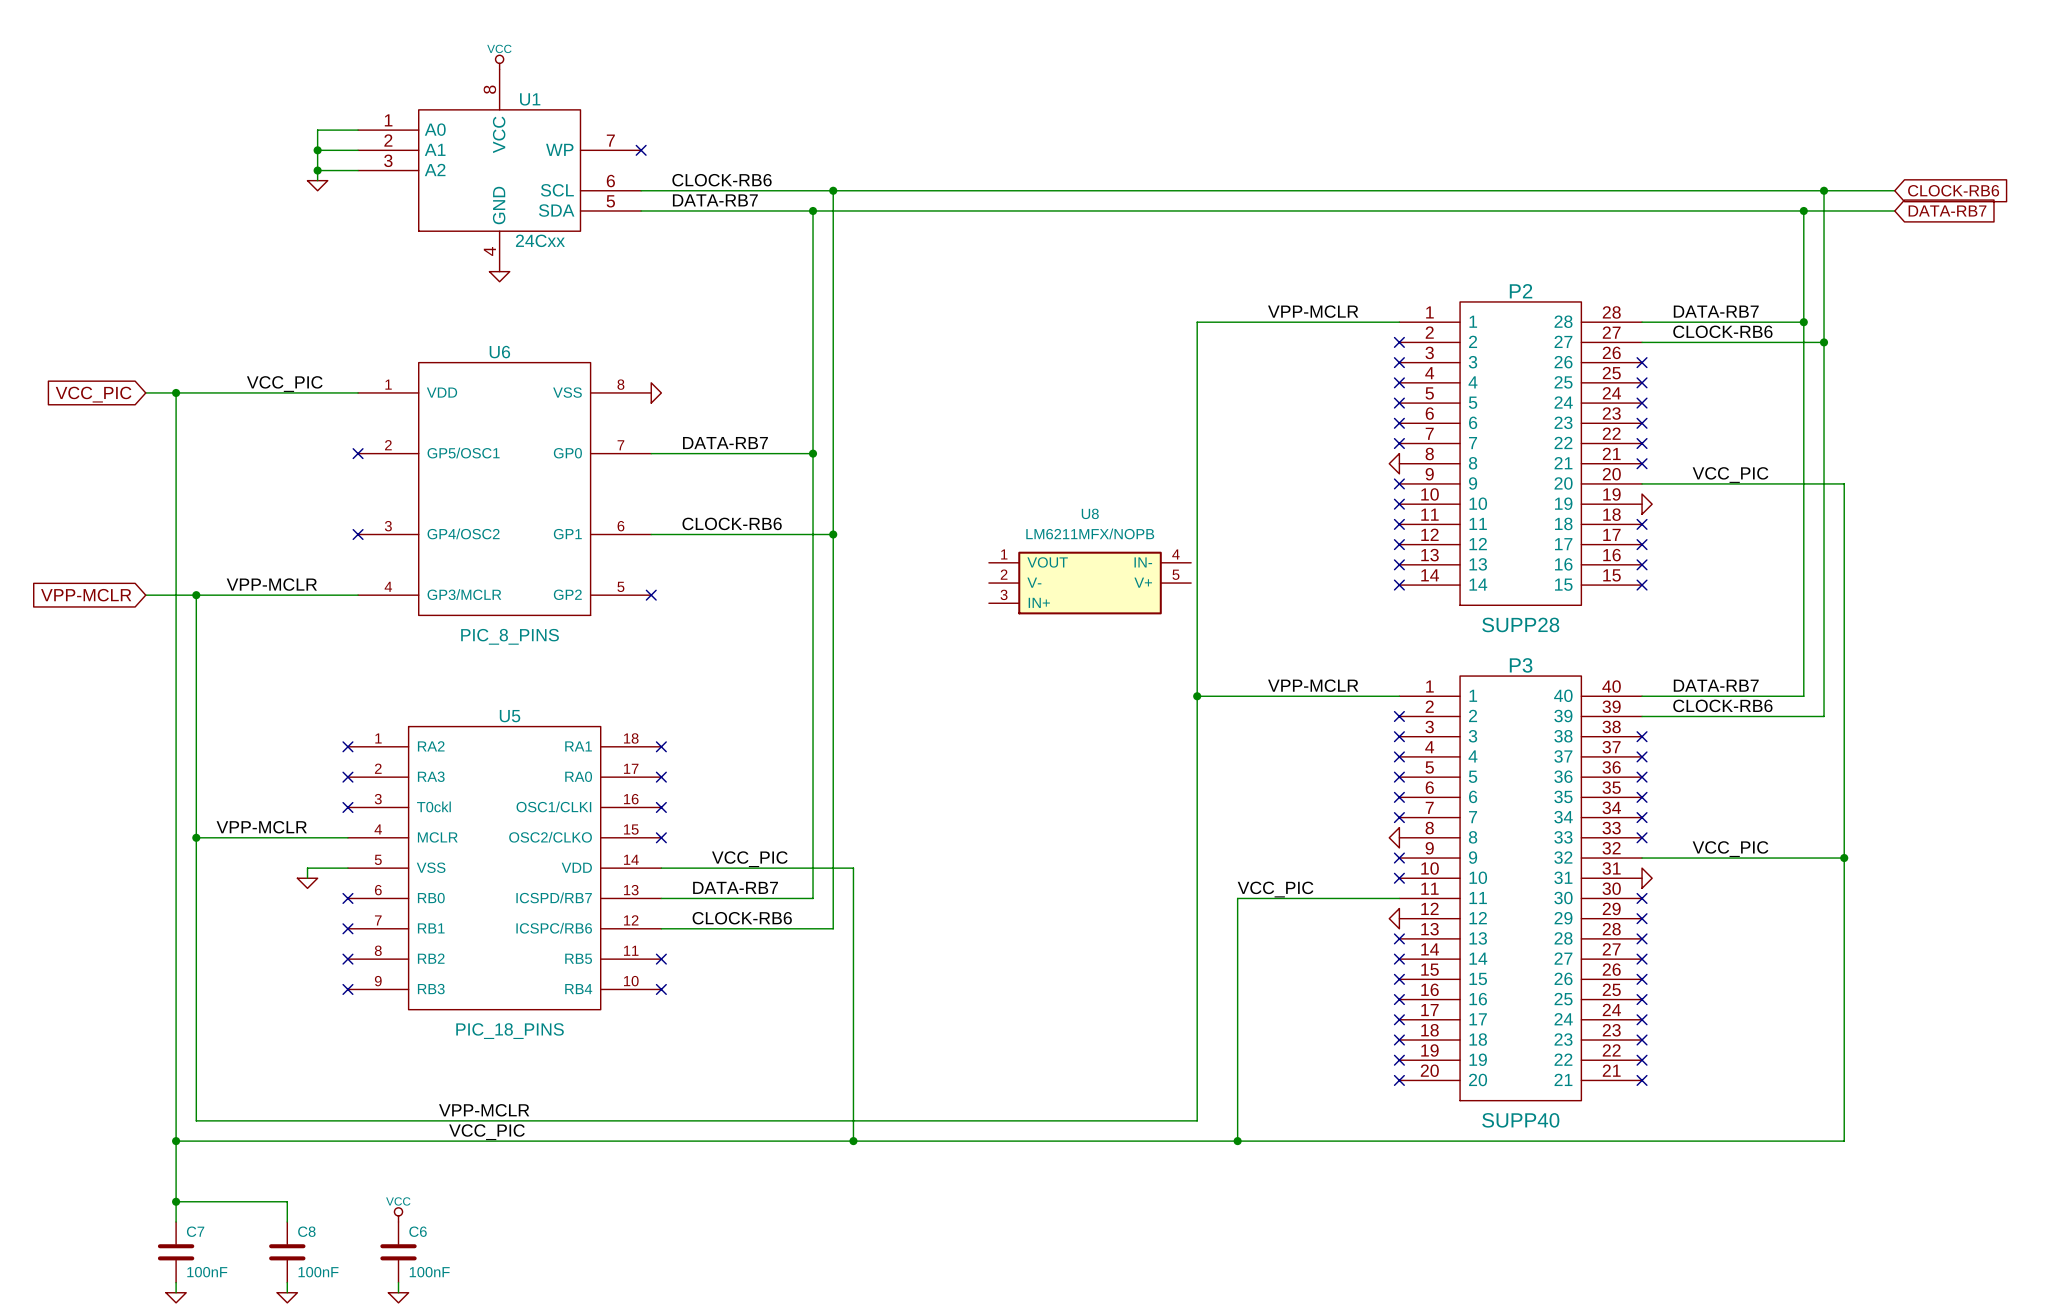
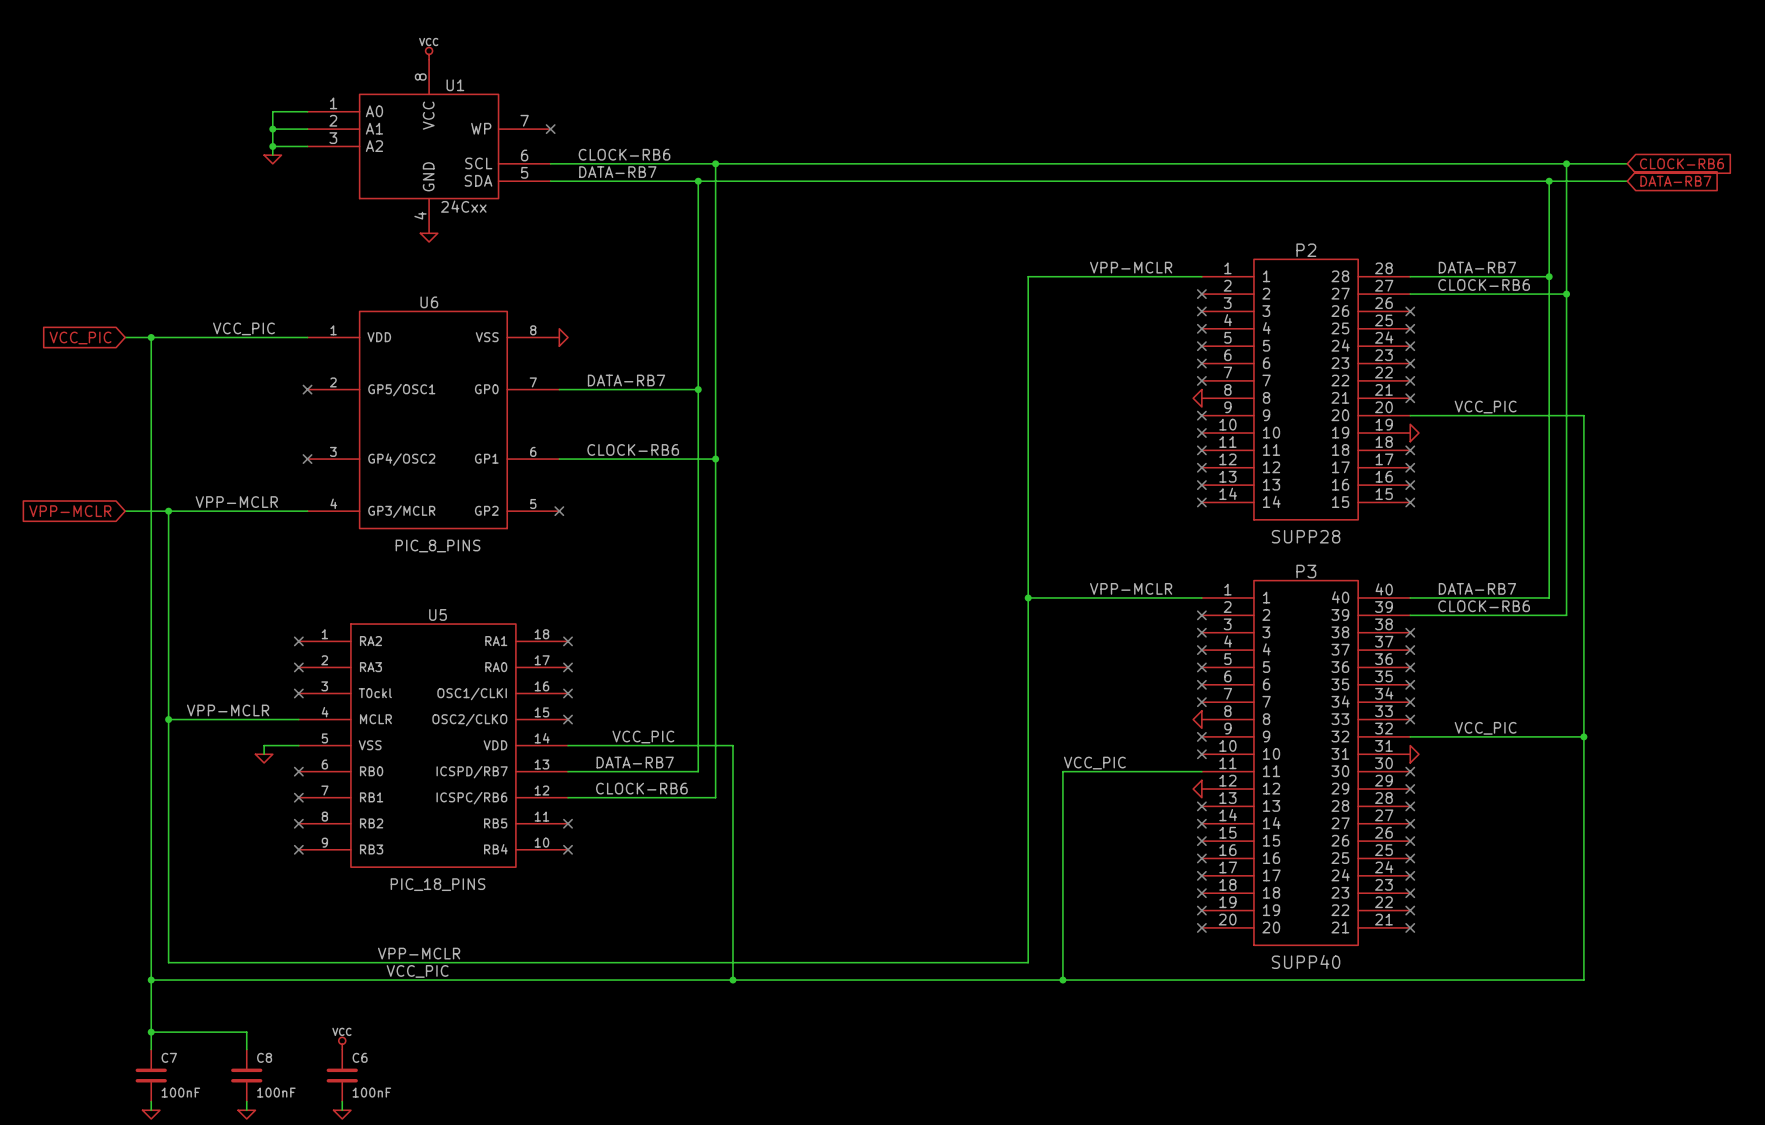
U8: LM6211MFX/NOPB (1090, 583) -> none

